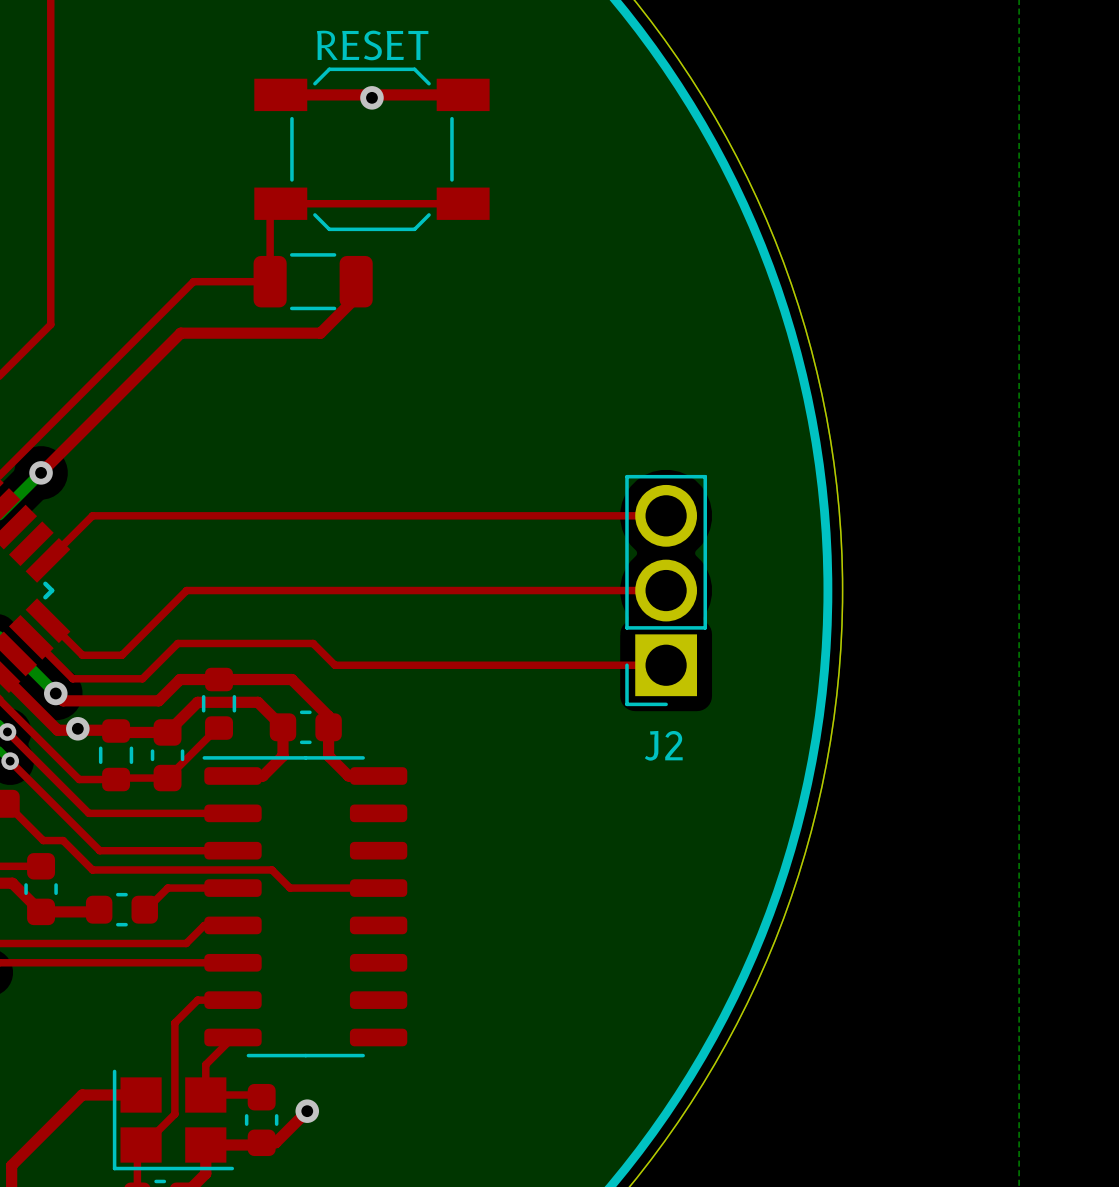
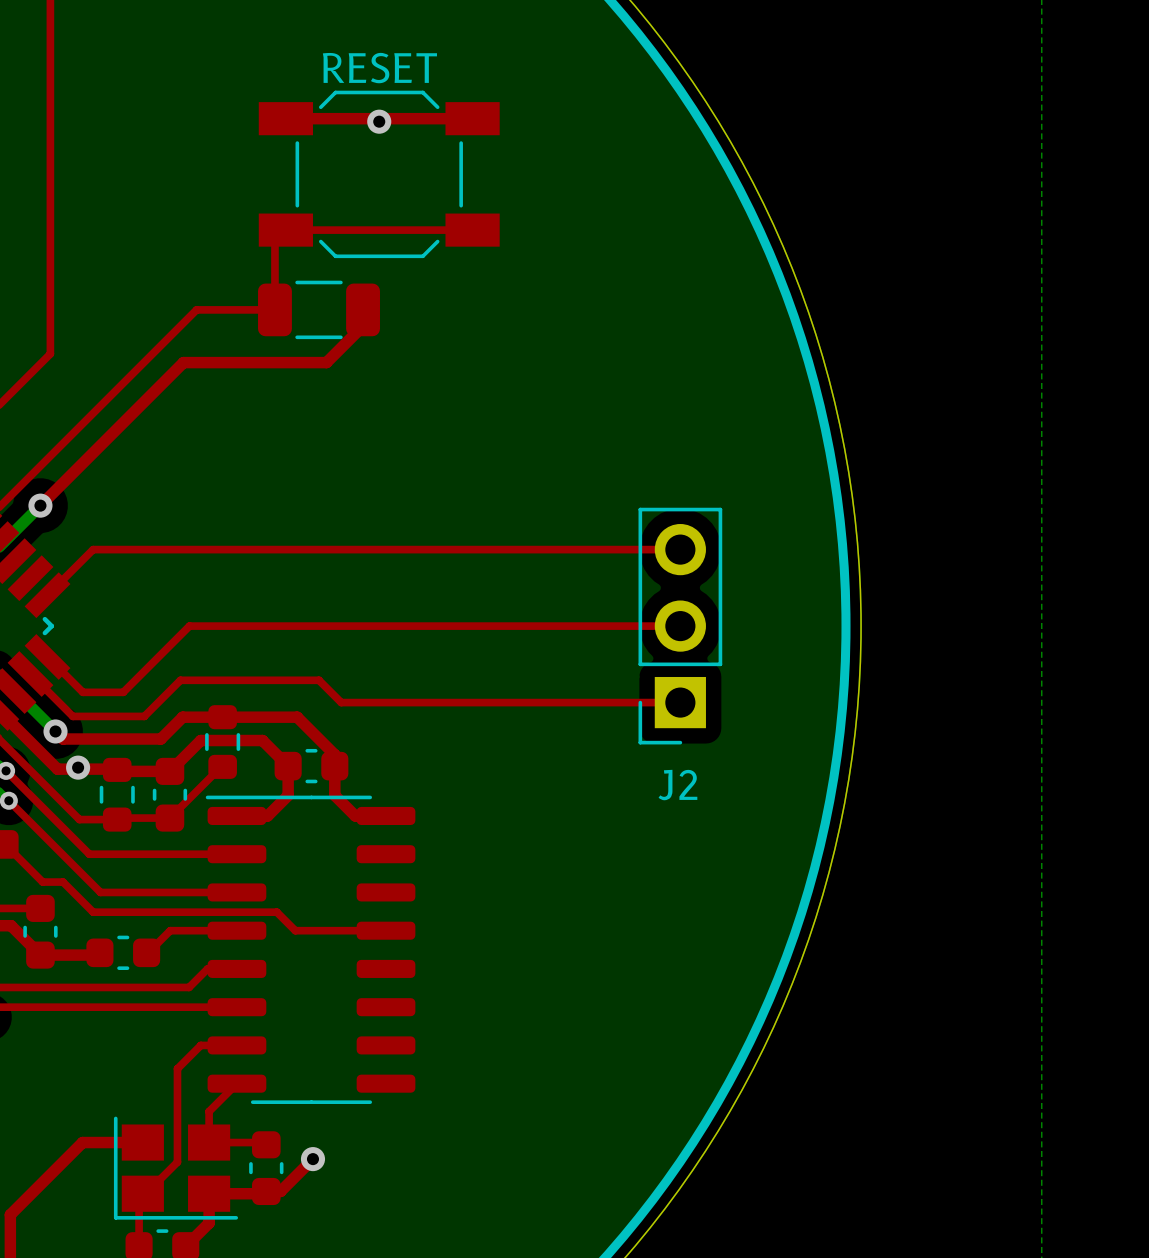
J2 footprint: [625, 474, 708, 707] -> [638, 507, 723, 745]

